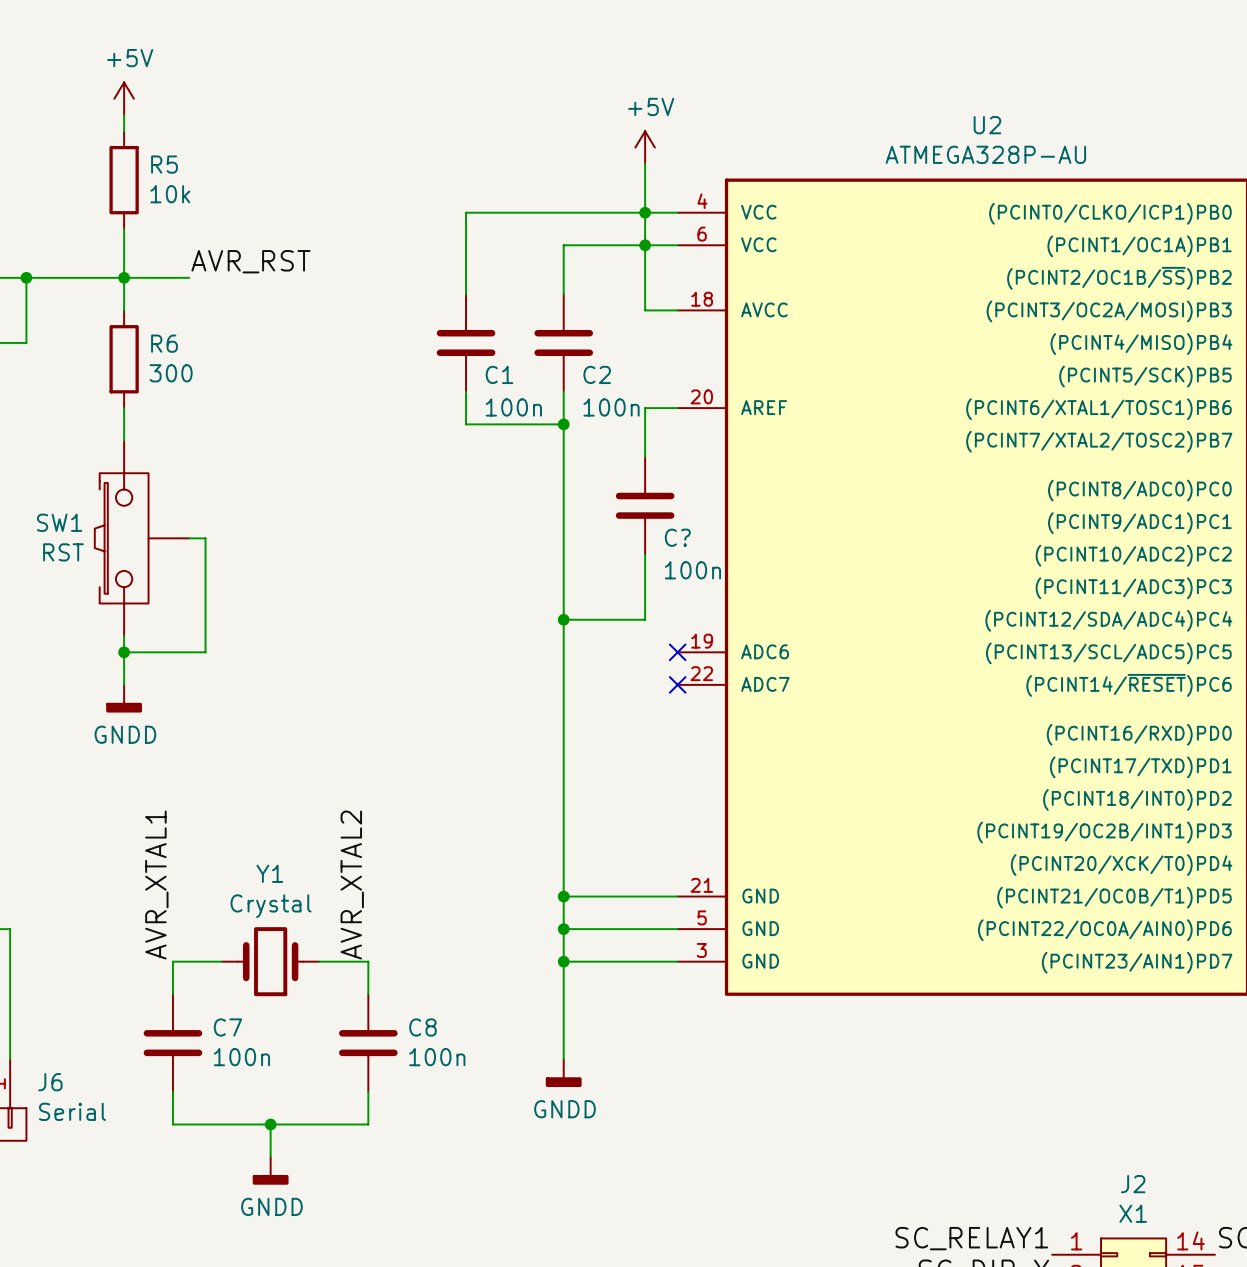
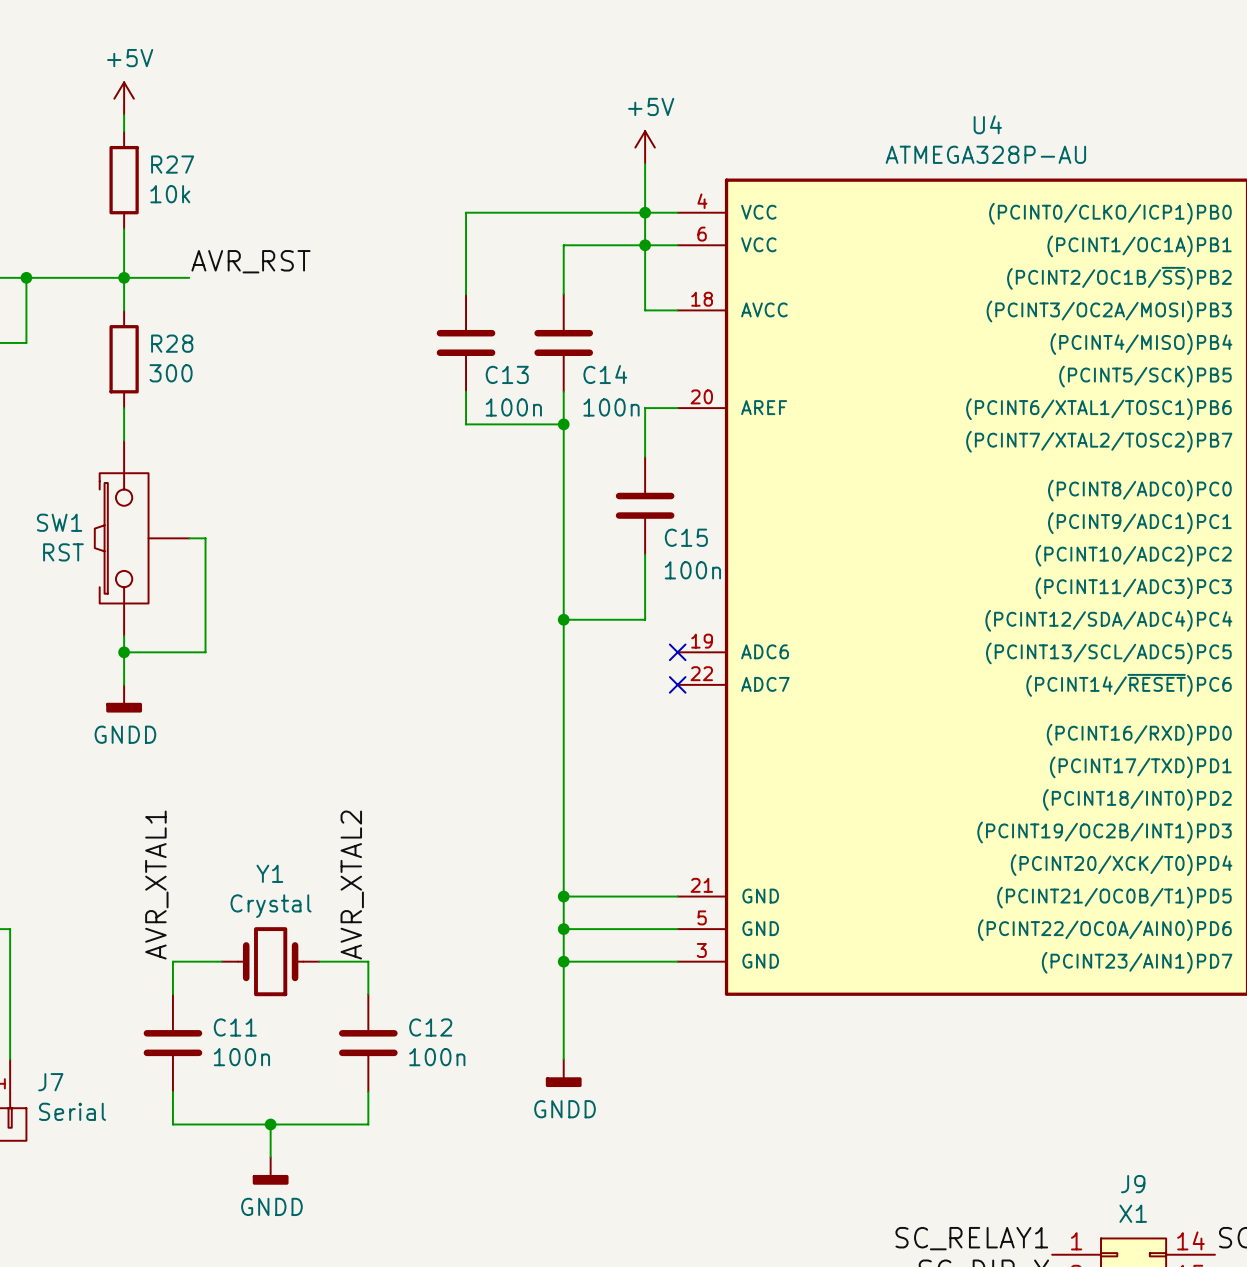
U2 name: U2 (987, 125) -> U4 (987, 124)
R5 name: R5 (164, 164) -> R27 (172, 164)
R6 name: R6 (164, 343) -> R28 (172, 343)
C1 name: C1 (499, 374) -> C13 (507, 374)
C2 name: C2 (597, 374) -> C14 (605, 374)
C? name: C? (677, 537) -> C15 (686, 537)
C7 name: C7 (227, 1027) -> C11 (235, 1027)
C8 name: C8 (422, 1027) -> C12 (430, 1027)
J6 name: J6 (50, 1082) -> J7 (50, 1082)
J2 name: J2 (1133, 1184) -> J9 (1133, 1184)

